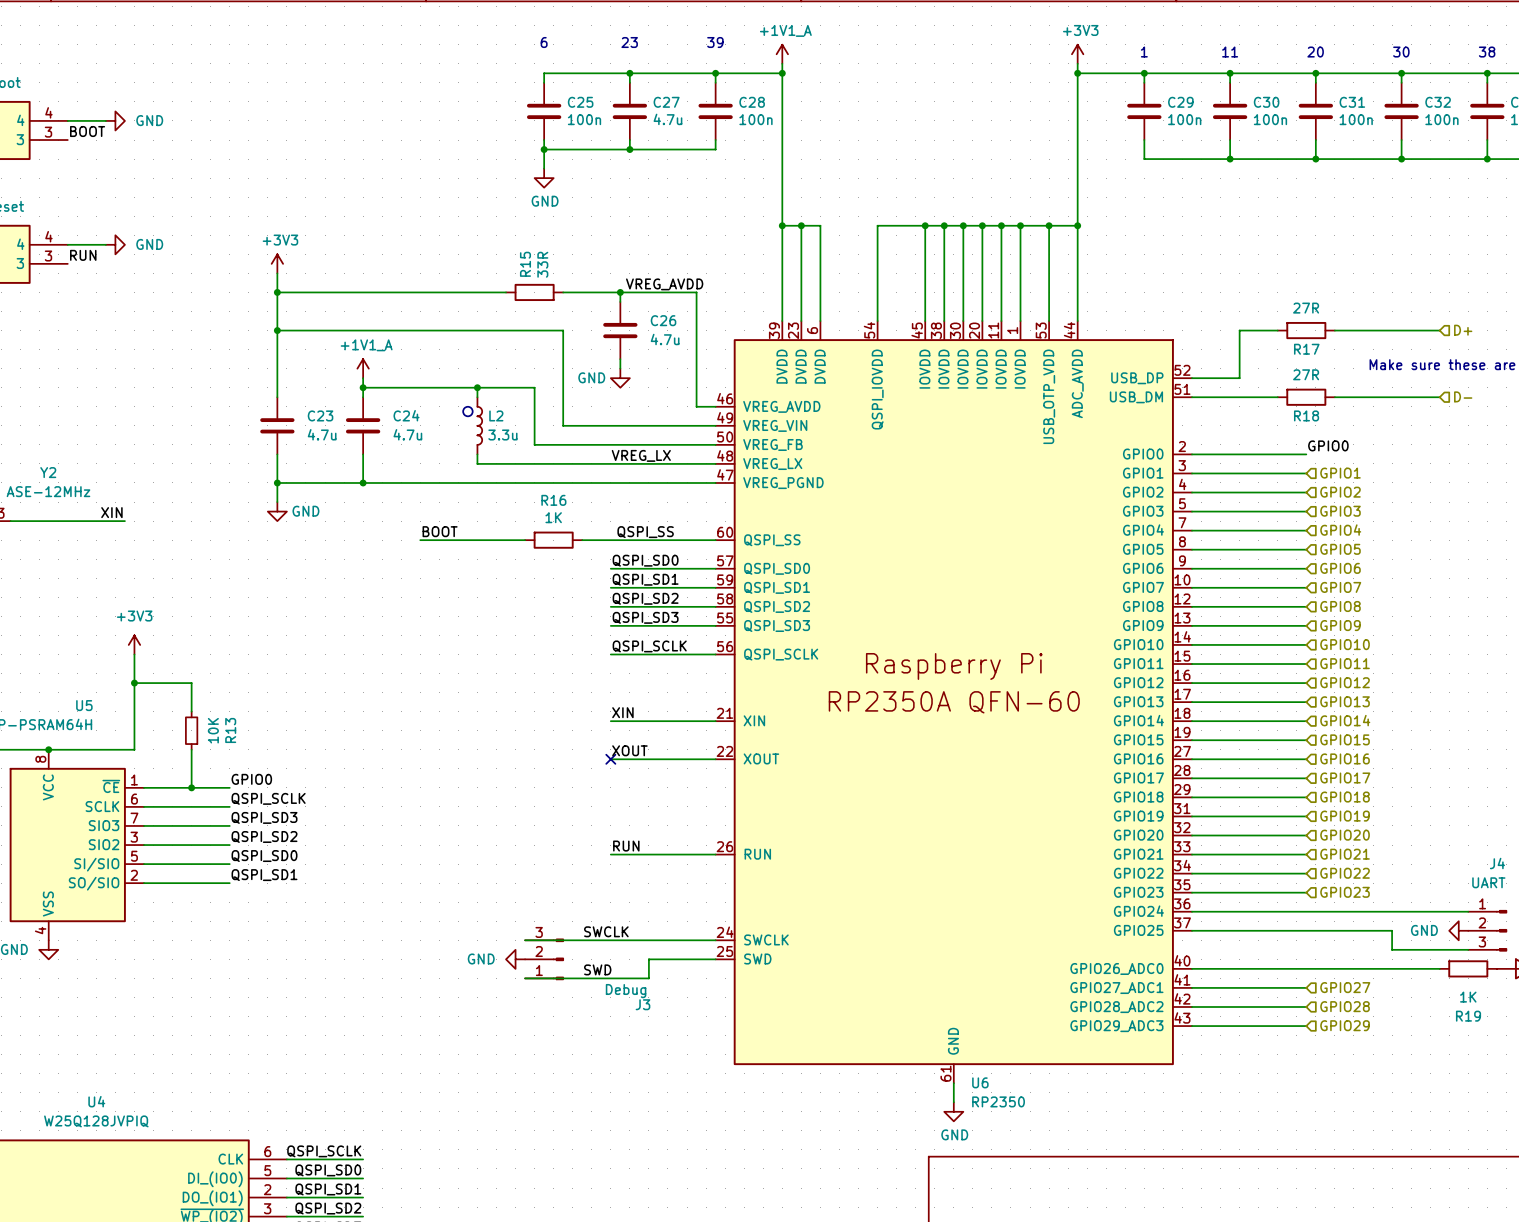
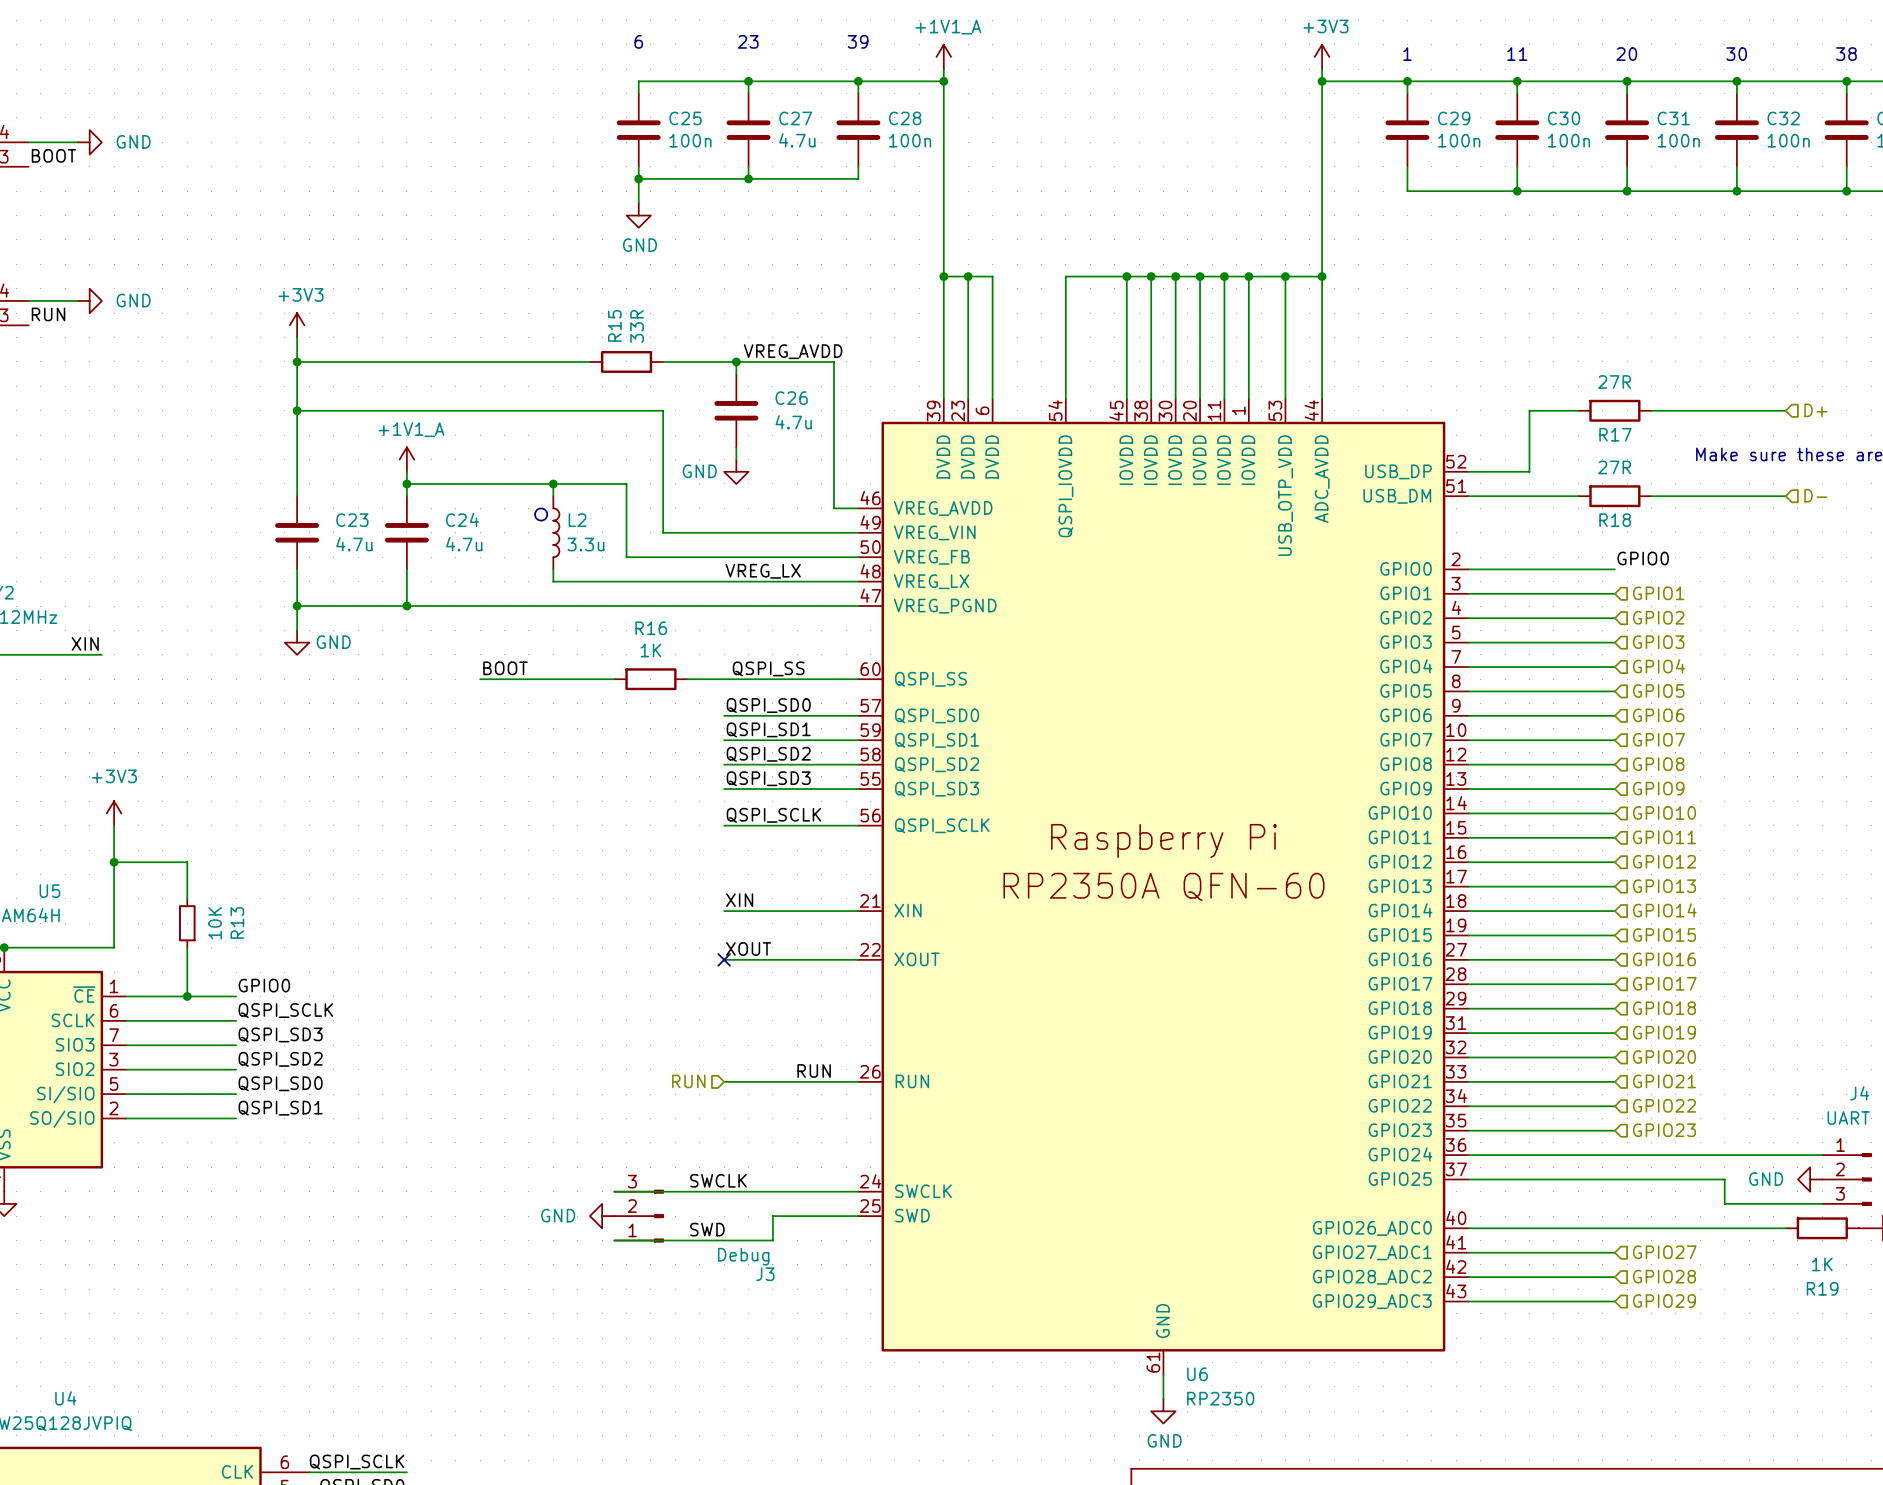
label position: RUN (626, 846) -> RUN (814, 1070)
hierarchical label: none -> RUN (688, 1081)

